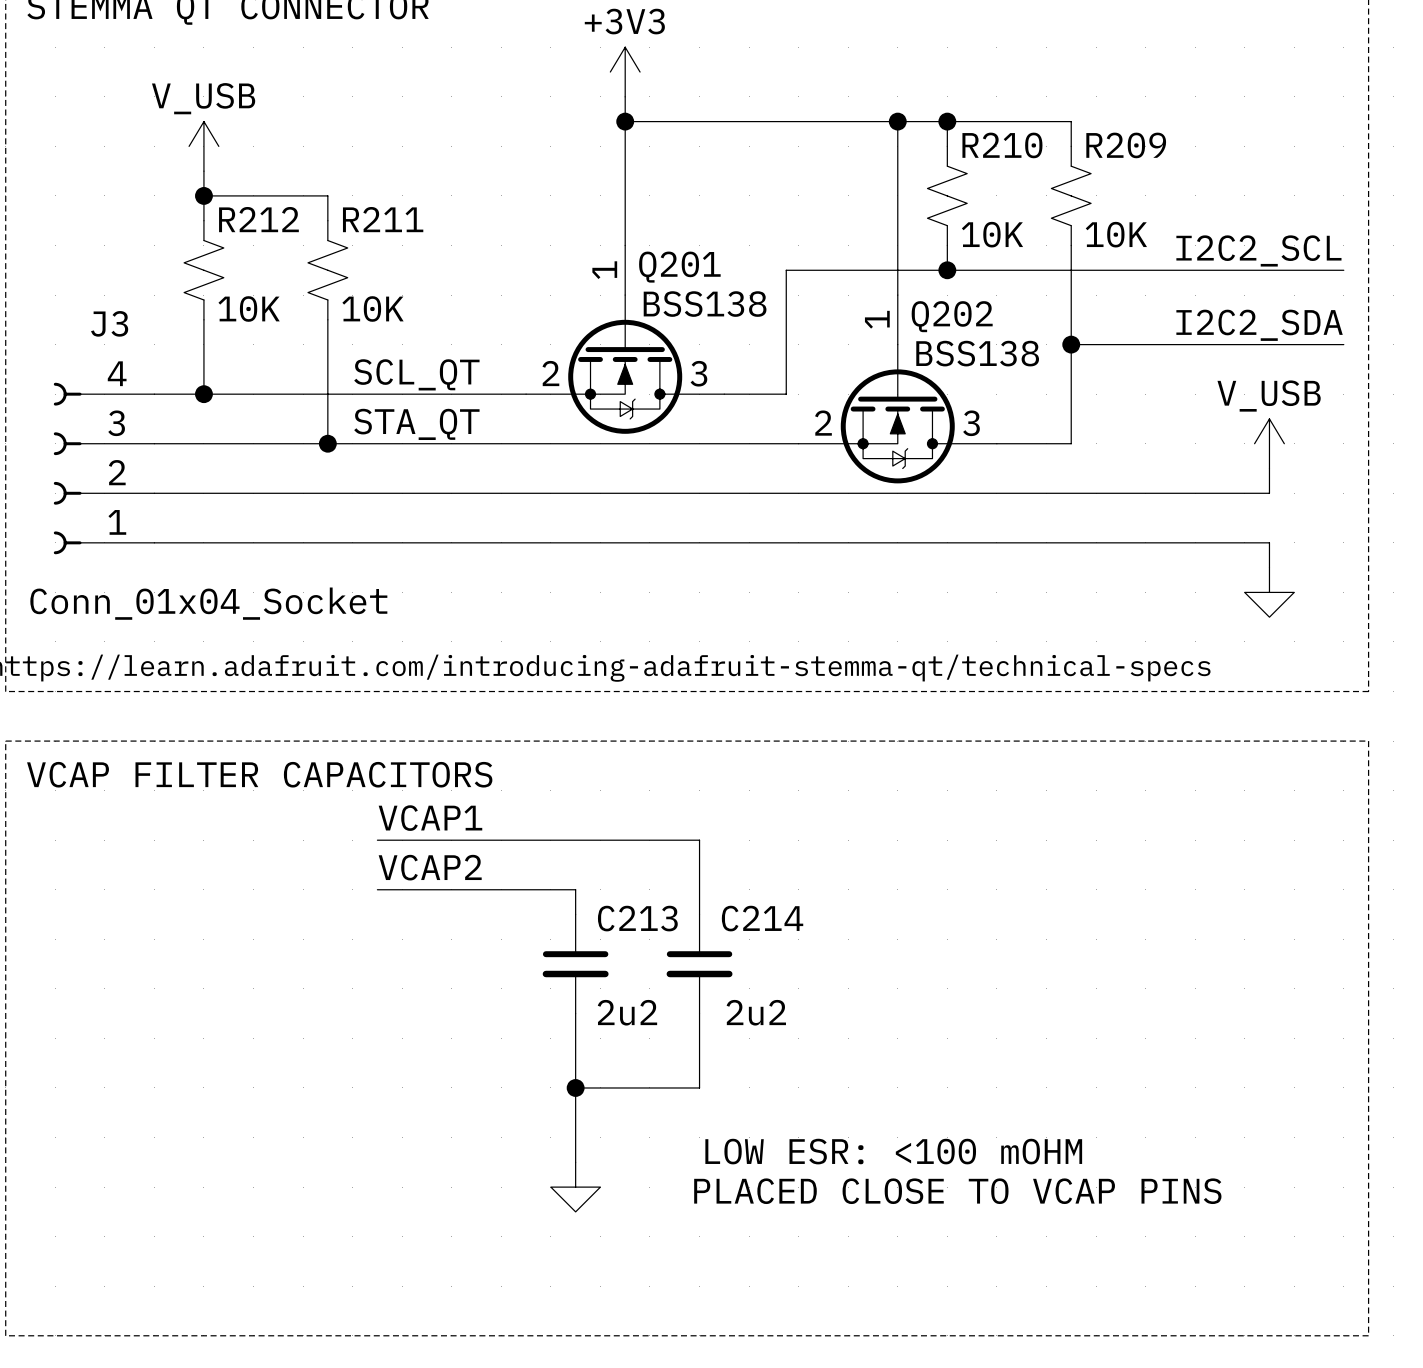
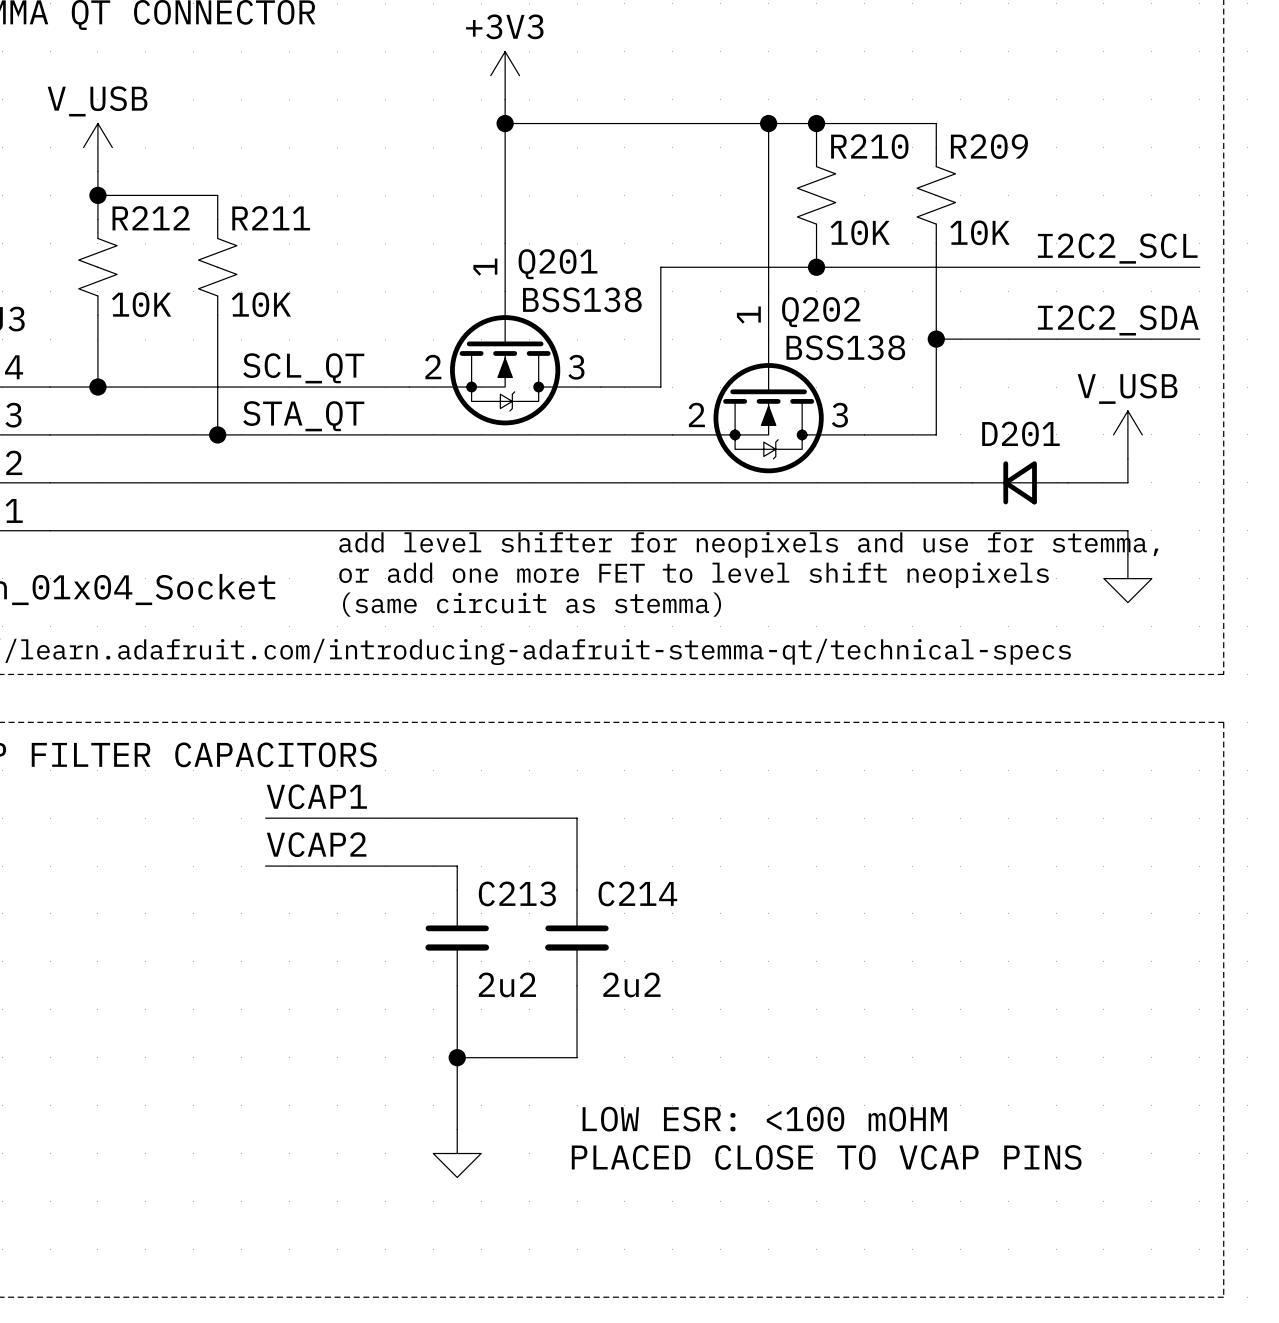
D201: none -> (1020, 482)
text: none -> add level shifter for neopixels and use for stemma, (748, 544)
text: none -> or add one more FET to level shift neopixels (694, 575)
text: none -> (same circuit as stemma) (532, 604)

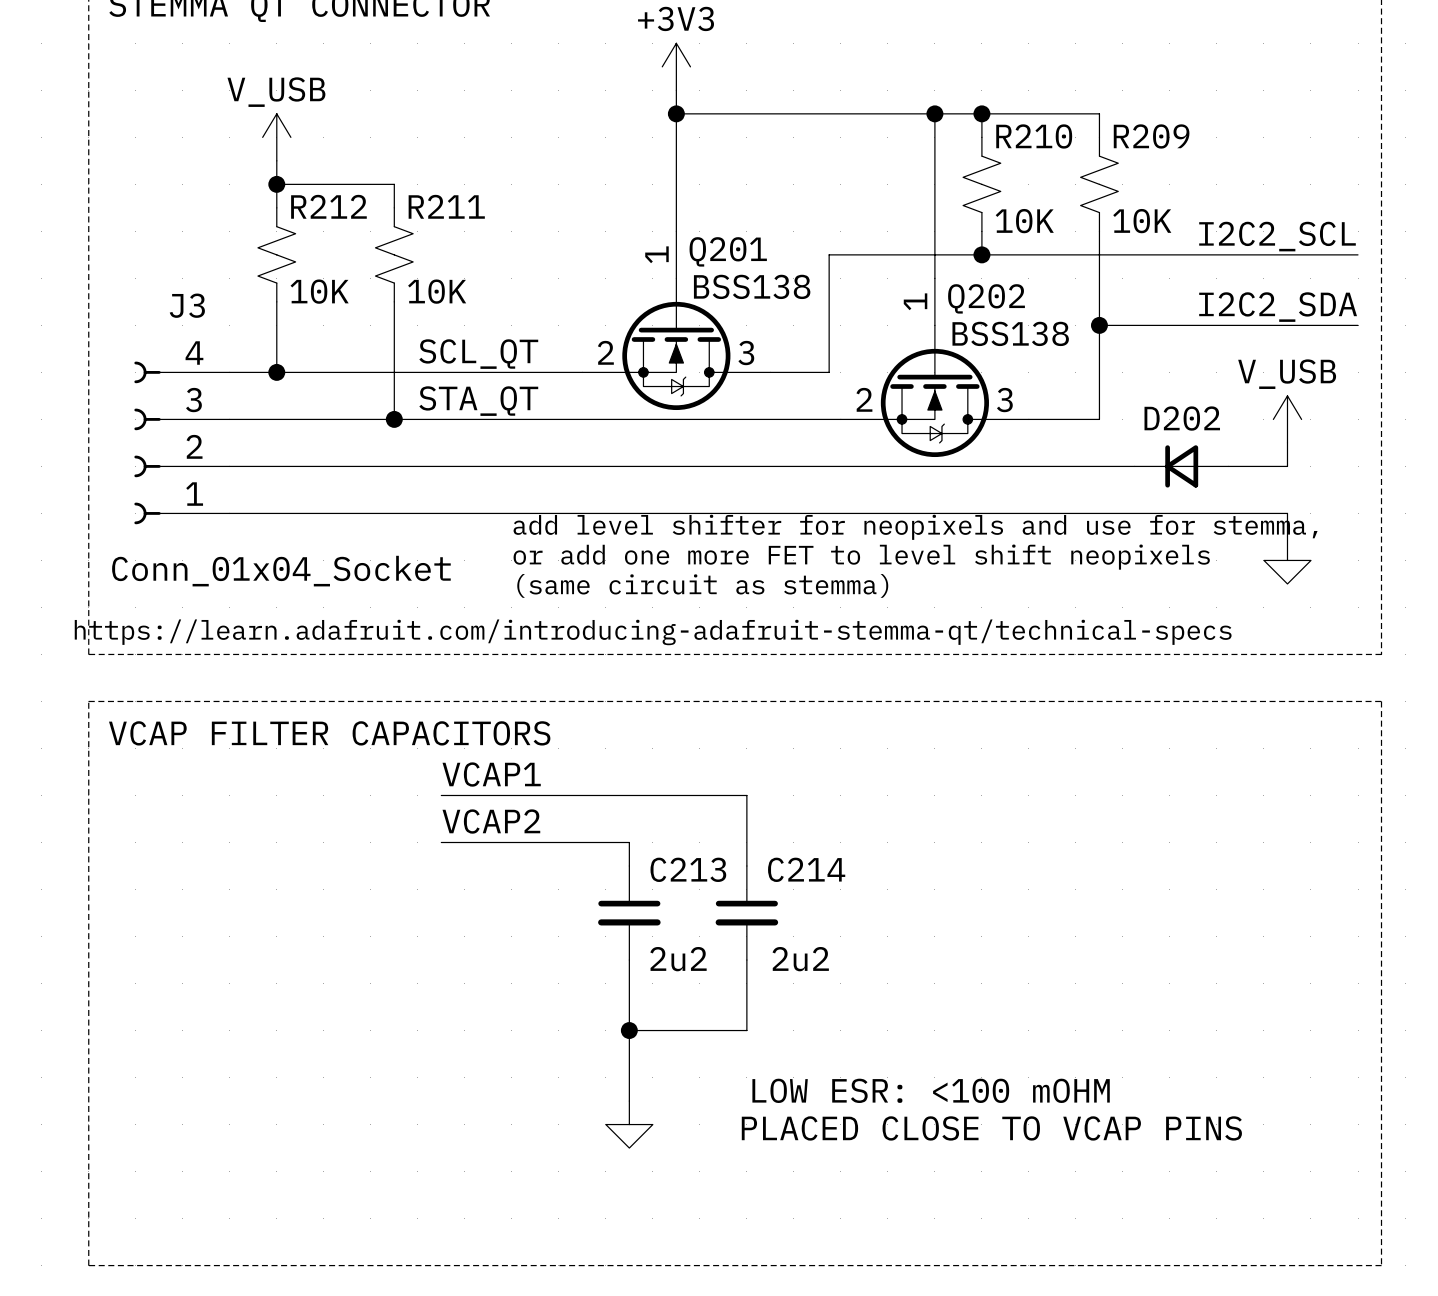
D201 name: D201 (1020, 434) -> D202 (1182, 418)

